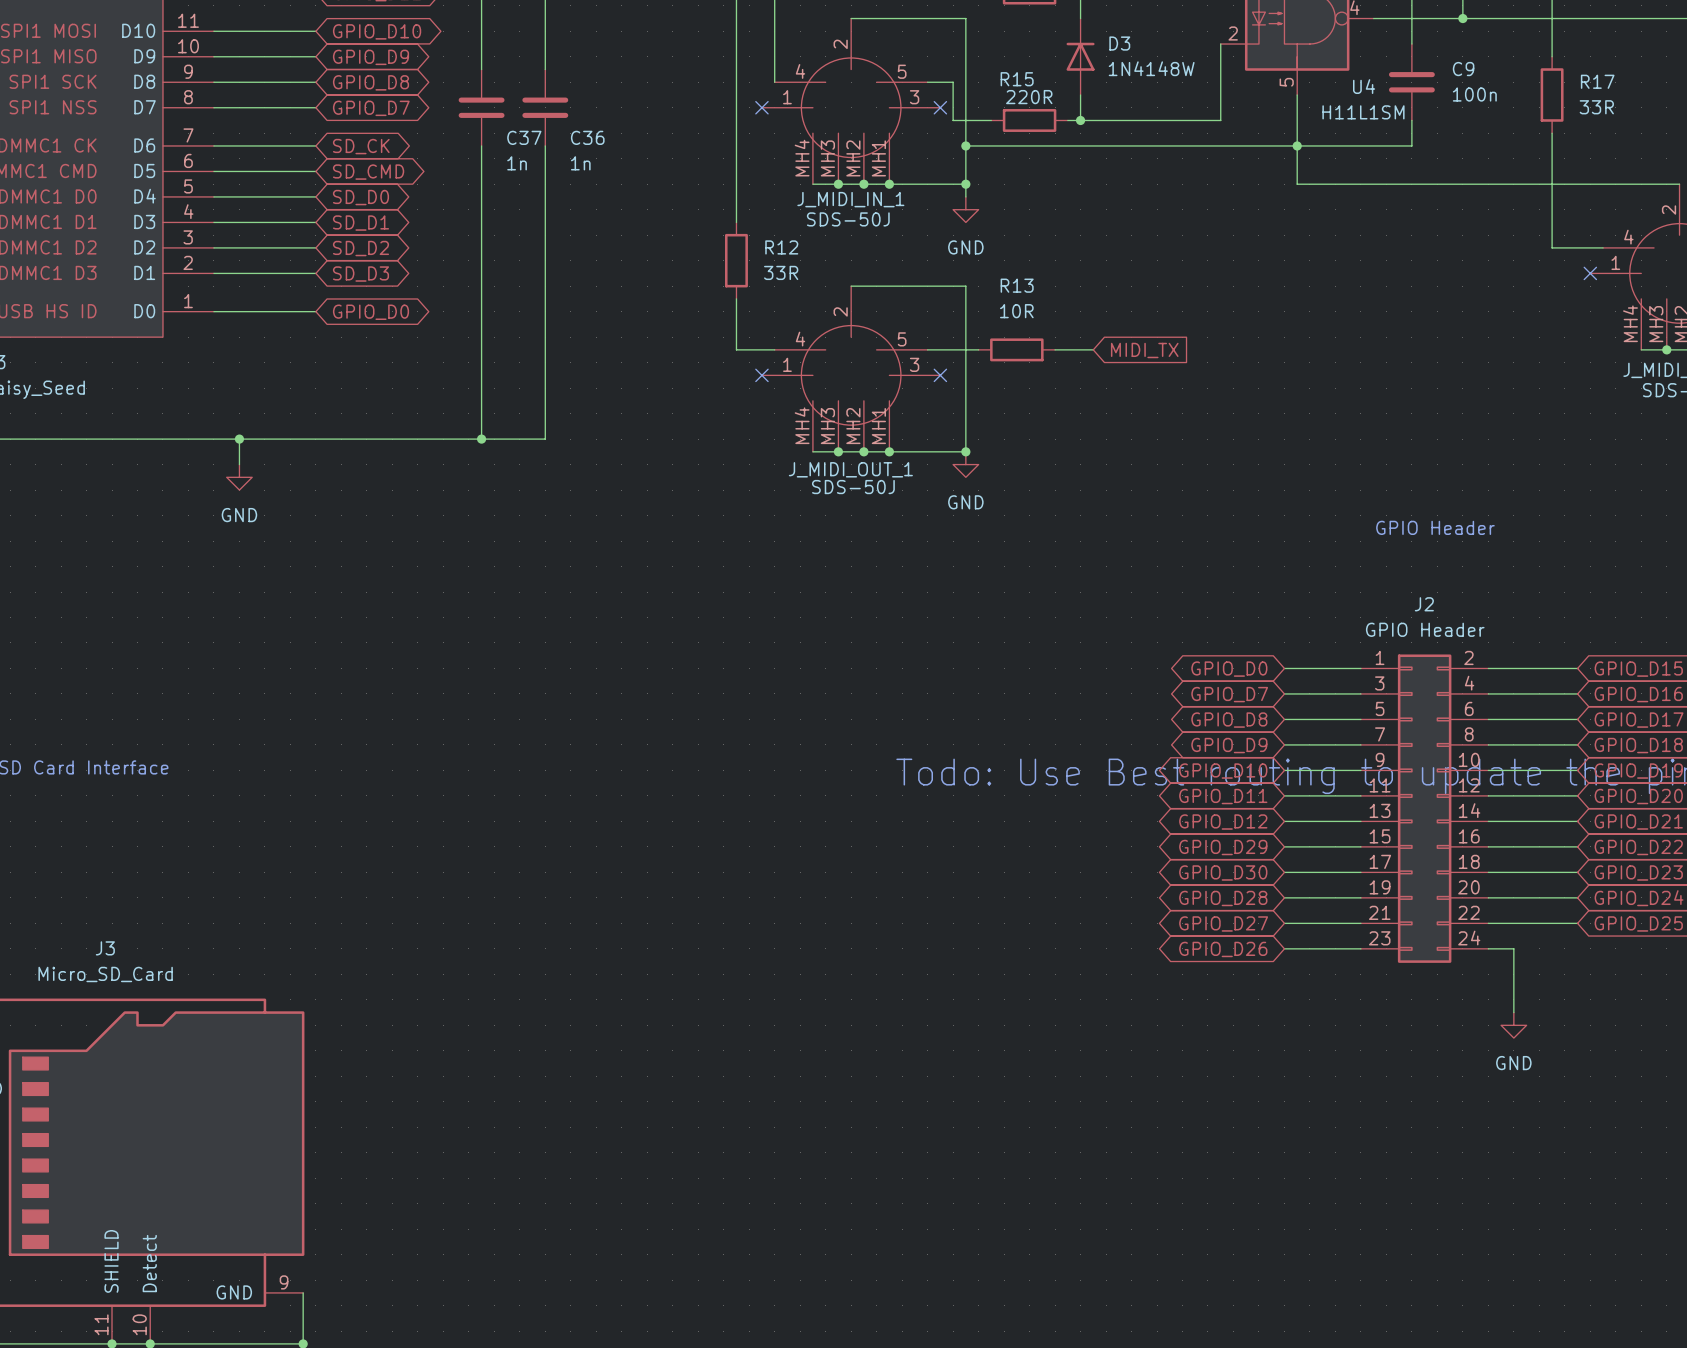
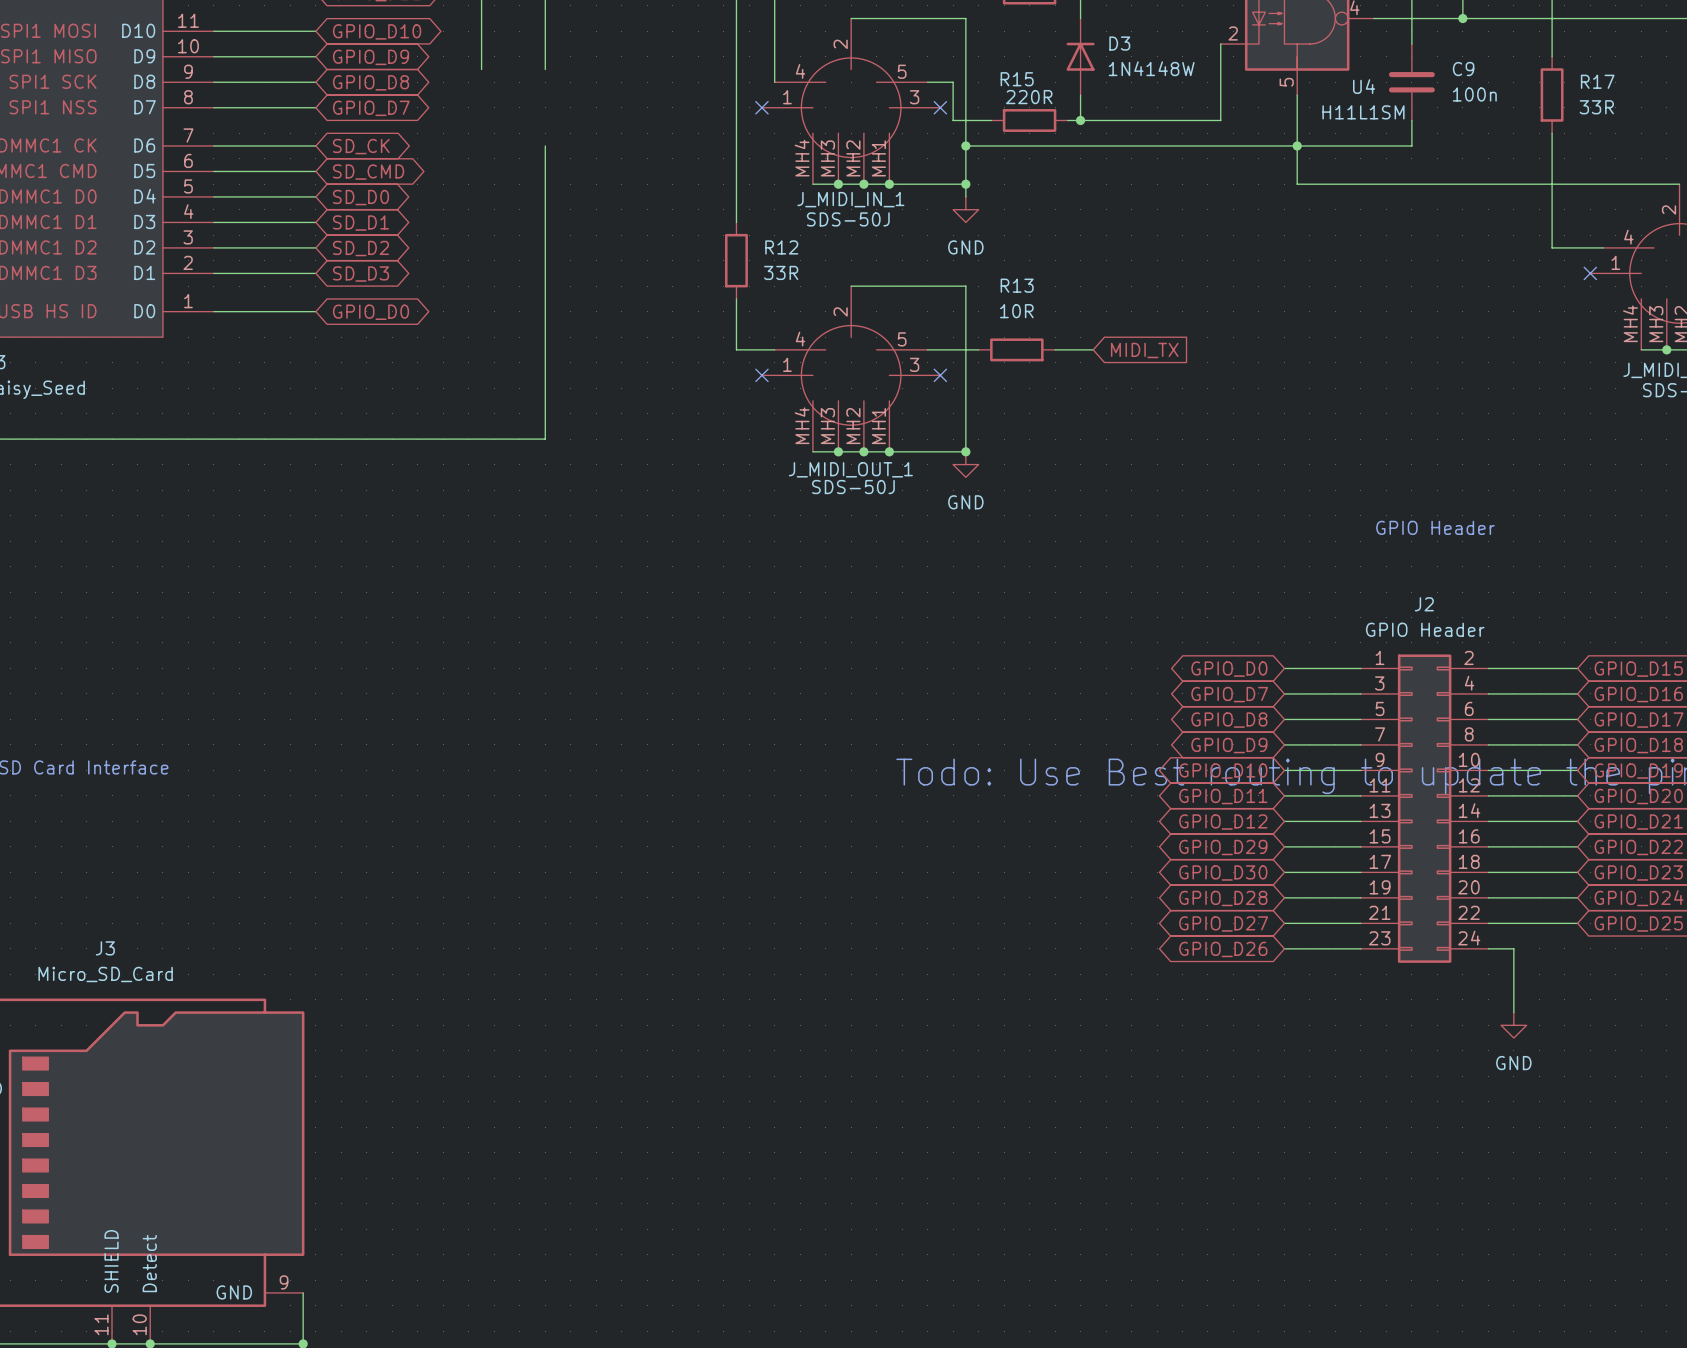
C37: 1n (481, 107) -> none
C36: 1n (545, 107) -> none
wire: (481, 145) (481, 439) -> none
wire: (239, 439) (239, 464) -> none
junction: (239, 439) -> none
junction: (481, 439) -> none
power symbol: GND (239, 477) -> none

